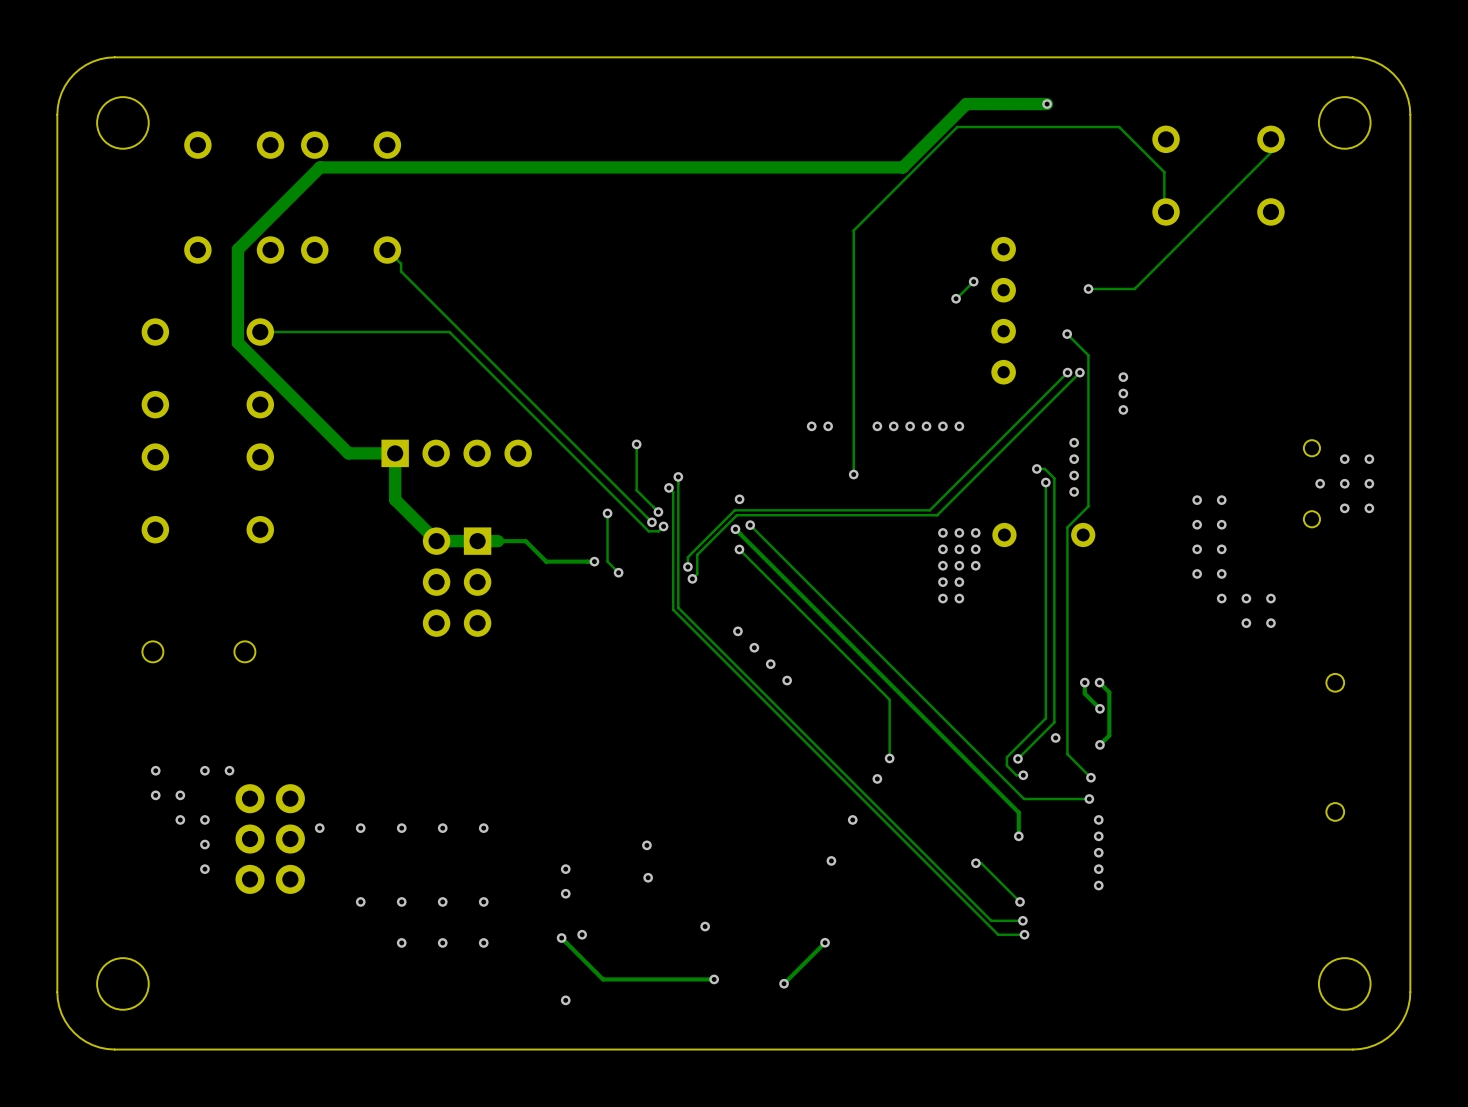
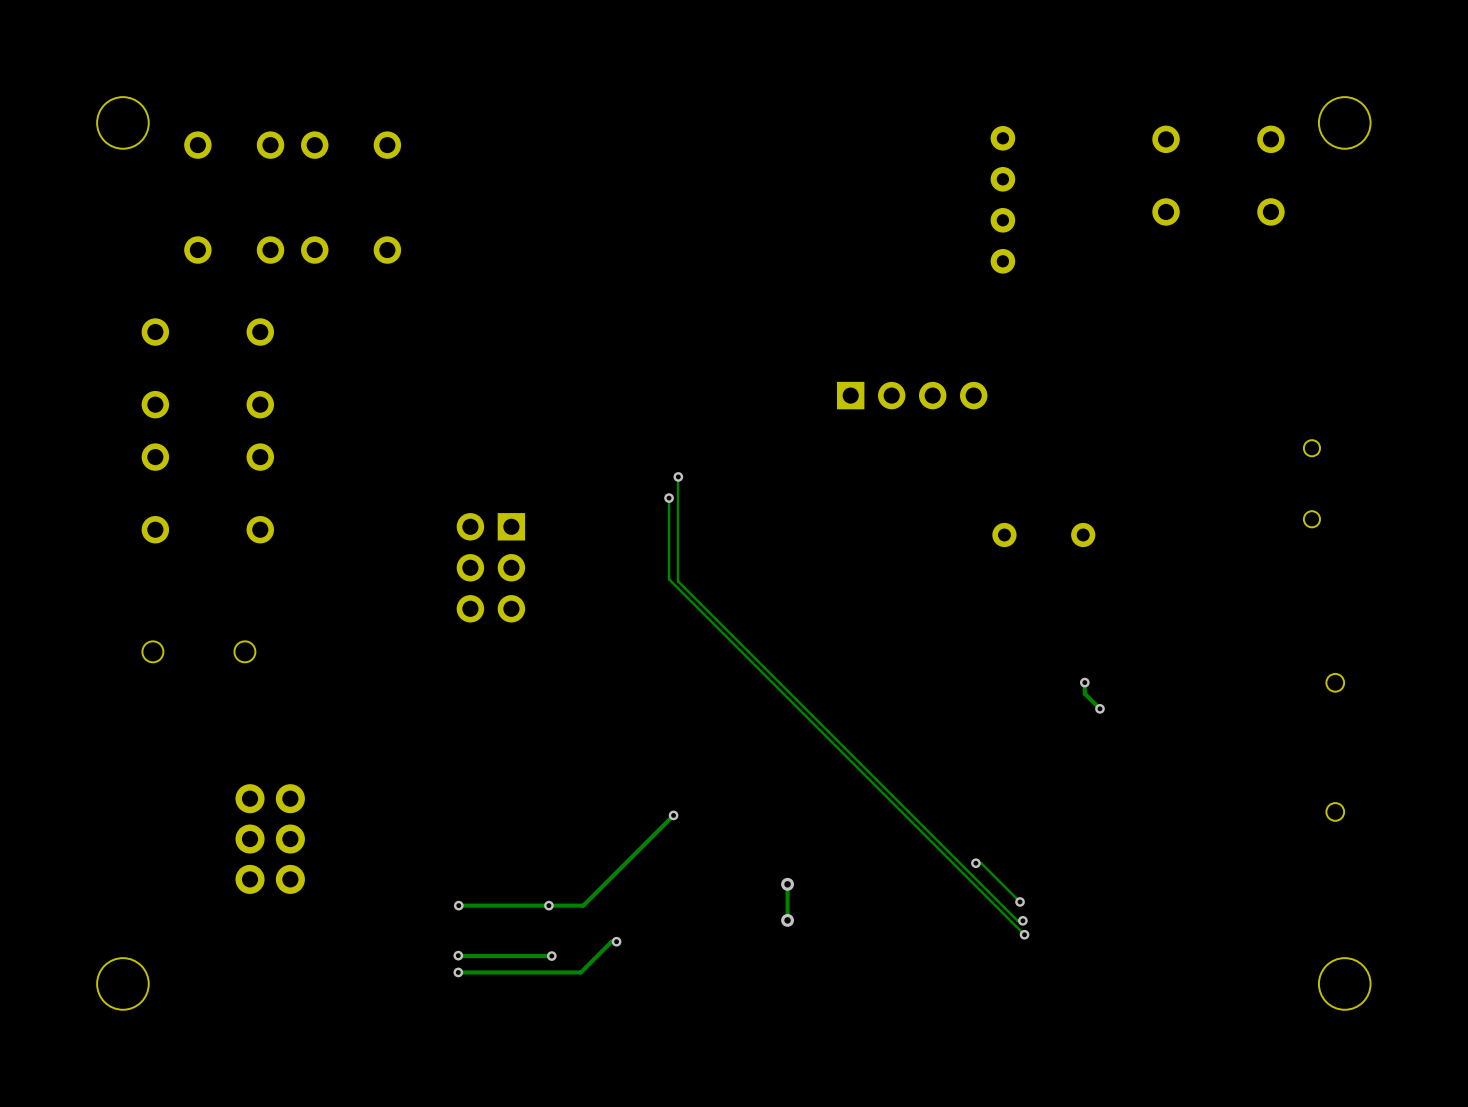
board edge: (1352, 57) (114, 57) (99, 59) (79, 69) (65, 86) (59, 99) (57, 114) (57, 992) (61, 1014) (69, 1027) (79, 1037) (92, 1045) (114, 1049) (1352, 1049) (1374, 1045) (1387, 1037) (1398, 1027) (1405, 1014) (1410, 992) (1410, 114) (1405, 92) (1393, 74) (1374, 61) (1352, 57) -> none
track: (1047, 104) (966, 104) (902, 167) (320, 167) (237, 249) (237, 342) (348, 453) (395, 453) (395, 499) (436, 541) (525, 541) (546, 561) (594, 561) -> none
via: (1047, 104) -> none
track: (1284, 139) (1134, 288) (1088, 288) -> none
track: (1166, 211) (1164, 210) (1164, 172) (1119, 127) (957, 127) (853, 230) (853, 474) -> none
track: (387, 250) (401, 263) (401, 271) (651, 522) -> none
track: (973, 281) (956, 298) -> none
via: (973, 281) -> none
via: (1088, 288) -> none
via: (956, 298) -> none
part position: (1003, 310) -> (1002, 199)
track: (260, 332) (449, 332) (648, 531) (658, 531) (663, 526) -> none
track: (1067, 334) (1088, 355) (1088, 506) (1067, 527) (1067, 754) (1090, 777) -> none
via: (1067, 334) -> none
track: (1067, 372) (929, 510) (734, 510) (687, 557) (687, 566) -> none
via: (1067, 372) -> none
track: (1079, 372) (937, 515) (736, 515) (697, 554) (697, 574) (692, 578) -> none
via: (1079, 372) -> none
via: (1123, 377) -> none
via: (1123, 393) -> none
part: none -> (912, 395)
via: (1123, 409) -> none
via: (811, 426) -> none
via: (828, 426) -> none
via: (877, 426) -> none
via: (893, 426) -> none
via: (910, 426) -> none
via: (926, 426) -> none
via: (942, 426) -> none
via: (959, 426) -> none
via: (1074, 442) -> none
track: (636, 444) (636, 490) (658, 512) -> none
via: (636, 444) -> none
part: (456, 453) -> none
via: (1074, 459) -> none
via: (1344, 459) -> none
via: (1369, 459) -> none
track: (1036, 468) (1044, 468) (1054, 478) (1054, 722) (1017, 758) -> none
via: (1036, 468) -> none
via: (853, 474) -> none
via: (1074, 475) -> none
track: (678, 476) (678, 607) (991, 920) (1022, 920) -> (678, 477) (678, 581) (1017, 920) (1022, 920)
track: (1045, 482) (1045, 718) (1006, 757) (1006, 765) (1016, 775) (1023, 775) -> none
via: (1045, 482) -> none
via: (1320, 483) -> none
via: (1344, 483) -> none
via: (1369, 483) -> none
track: (668, 487) (673, 492) (673, 609) (998, 934) (1024, 934) -> (669, 498) (669, 579) (1024, 934)
via: (668, 487) -> none
via: (1074, 491) -> none
via: none -> (669, 498)
via: (739, 499) -> none
via: (1197, 500) -> none
via: (1221, 500) -> none
via: (1344, 508) -> none
via: (1369, 508) -> none
via: (658, 512) -> none
track: (607, 513) (607, 561) (618, 572) -> none
via: (607, 513) -> none
via: (651, 522) -> none
via: (1197, 524) -> none
via: (1221, 524) -> none
track: (750, 525) (1024, 799) (1089, 799) -> none
via: (750, 525) -> none
via: (663, 526) -> none
track: (735, 529) (1018, 812) (1018, 836) -> none
via: (735, 529) -> none
via: (942, 532) -> none
via: (959, 532) -> none
via: (975, 532) -> none
track: (739, 549) (889, 699) (889, 758) -> none
via: (739, 549) -> none
via: (942, 549) -> none
via: (959, 549) -> none
via: (975, 549) -> none
via: (1197, 549) -> none
via: (1221, 549) -> none
via: (594, 561) -> none
via: (942, 565) -> none
via: (959, 565) -> none
via: (975, 565) -> none
via: (687, 566) -> none
via: (618, 572) -> none
via: (1197, 573) -> none
via: (1221, 573) -> none
via: (692, 578) -> none
part position: (457, 582) -> (490, 567)
via: (942, 582) -> none
via: (959, 582) -> none
via: (942, 598) -> none
via: (959, 598) -> none
via: (1221, 598) -> none
via: (1246, 598) -> none
via: (1270, 598) -> none
via: (1246, 623) -> none
via: (1270, 623) -> none
via: (737, 631) -> none
via: (754, 647) -> none
via: (770, 664) -> none
via: (787, 680) -> none
track: (1099, 682) (1109, 692) (1109, 735) (1099, 744) -> none
via: (1099, 682) -> none
via: (1055, 737) -> none
via: (1099, 744) -> none
via: (889, 758) -> none
via: (1017, 758) -> none
via: (155, 770) -> none
via: (204, 770) -> none
via: (229, 770) -> none
via: (1023, 775) -> none
via: (1090, 777) -> none
via: (877, 778) -> none
via: (155, 795) -> none
via: (180, 795) -> none
via: (1089, 799) -> none
track: none -> (673, 815) (583, 905) (458, 905)
via: none -> (673, 815)
via: (180, 819) -> none
via: (204, 819) -> none
via: (852, 819) -> none
via: (1098, 819) -> none
via: (319, 828) -> none
via: (360, 828) -> none
via: (401, 828) -> none
via: (442, 828) -> none
via: (483, 828) -> none
via: (1018, 836) -> none
via: (1098, 836) -> none
via: (204, 844) -> none
via: (646, 845) -> none
via: (1098, 852) -> none
via: (831, 860) -> none
via: (204, 869) -> none
via: (565, 869) -> none
via: (1098, 869) -> none
via: (648, 877) -> none
track: none -> (787, 884) (787, 920)
via: none -> (787, 884)
via: (1098, 885) -> none
via: (565, 893) -> none
via: (360, 901) -> none
via: (401, 901) -> none
via: (442, 901) -> none
via: (483, 901) -> none
via: none -> (458, 905)
via: none -> (548, 905)
via: none -> (787, 920)
via: (705, 926) -> none
via: (582, 934) -> none
track: (561, 938) (603, 979) (714, 979) -> none
via: (561, 938) -> none
track: none -> (616, 941) (611, 941) (580, 972) (458, 972)
via: none -> (616, 941)
via: (401, 942) -> none
via: (442, 942) -> none
via: (483, 942) -> none
track: (825, 942) (784, 983) -> none
via: (825, 942) -> none
track: none -> (458, 955) (551, 956)
via: none -> (458, 955)
via: none -> (551, 956)
via: none -> (458, 972)
via: (714, 979) -> none
via: (784, 983) -> none
via: (565, 1000) -> none

